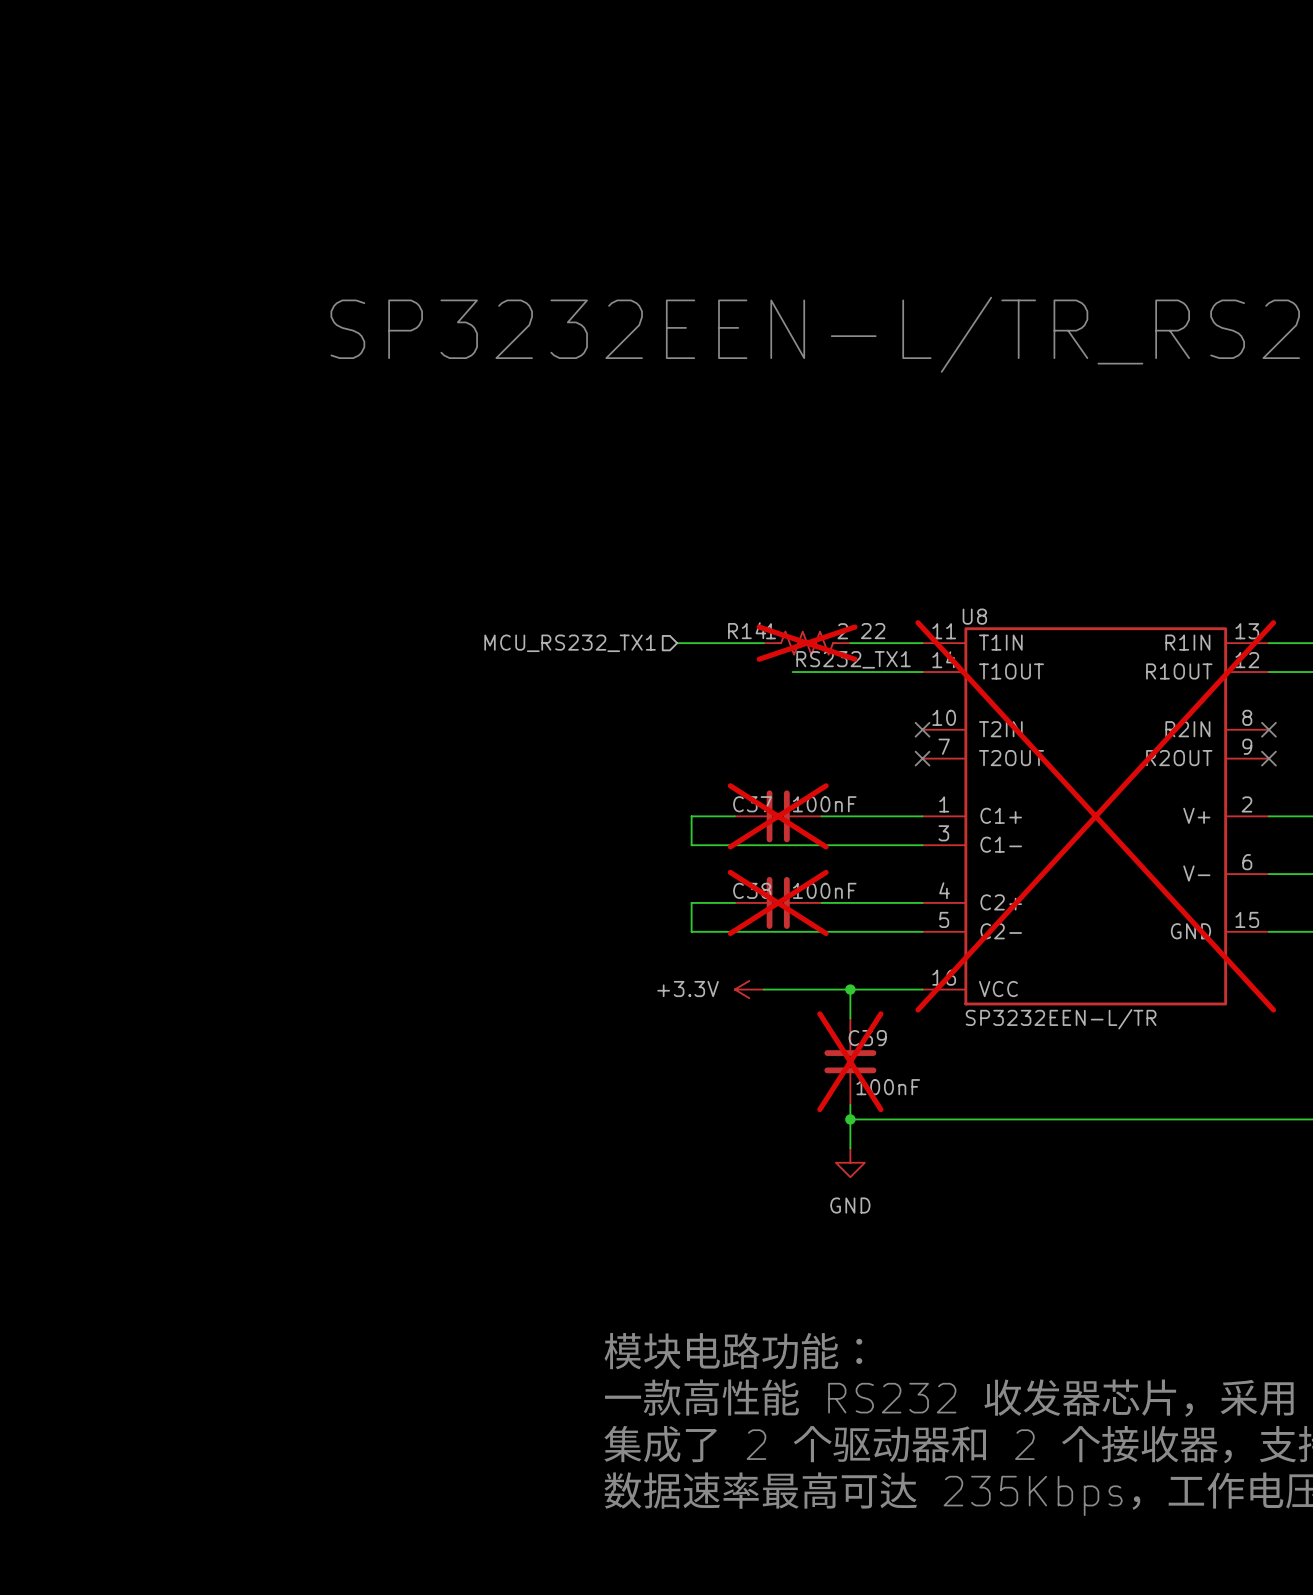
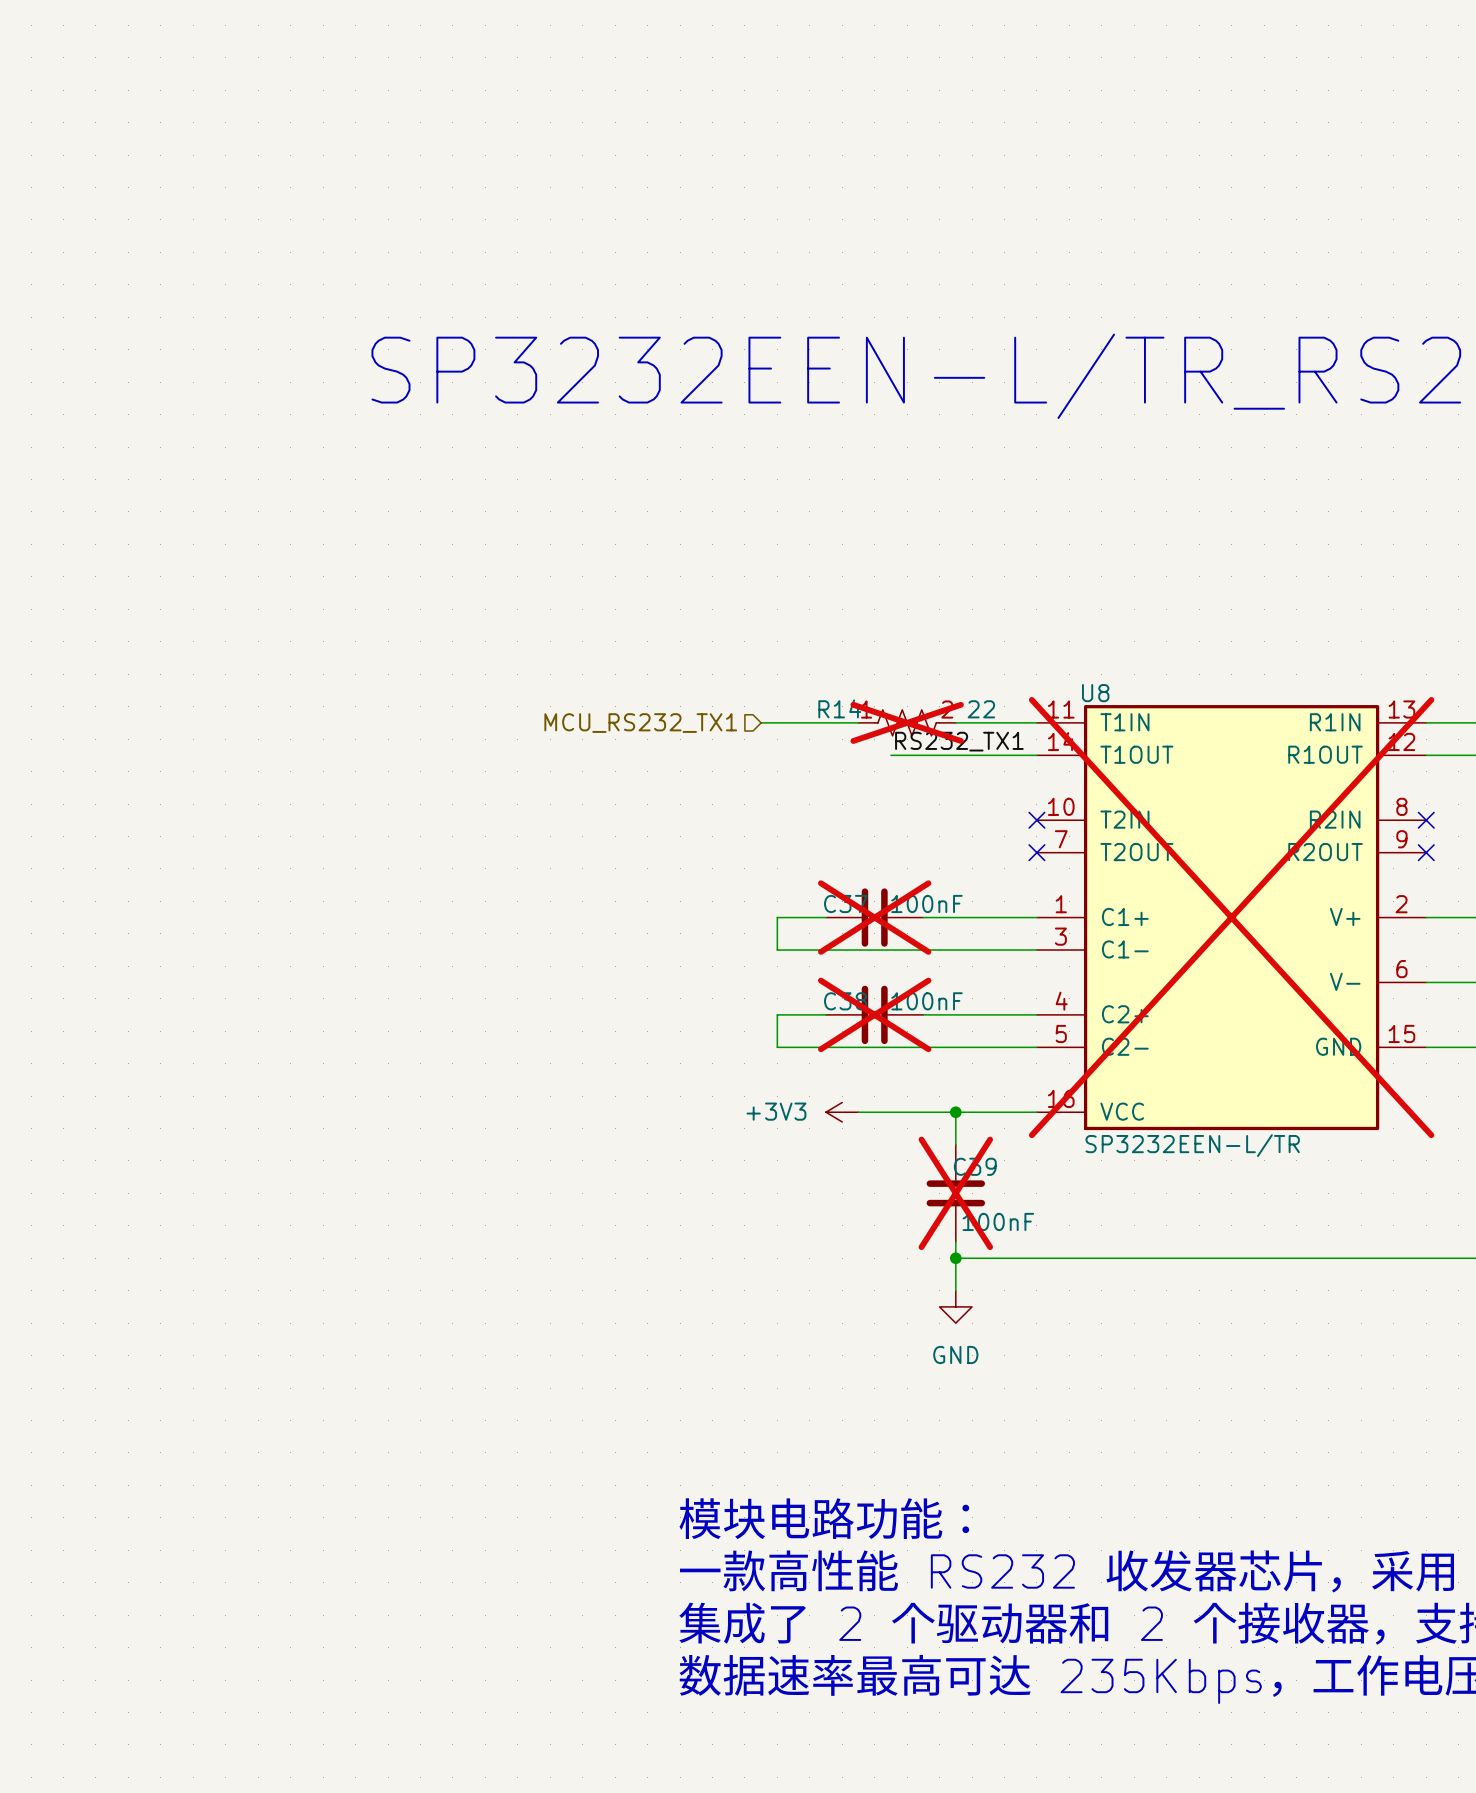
power symbol: +3.3V (749, 989) -> +3V3 (842, 1112)

